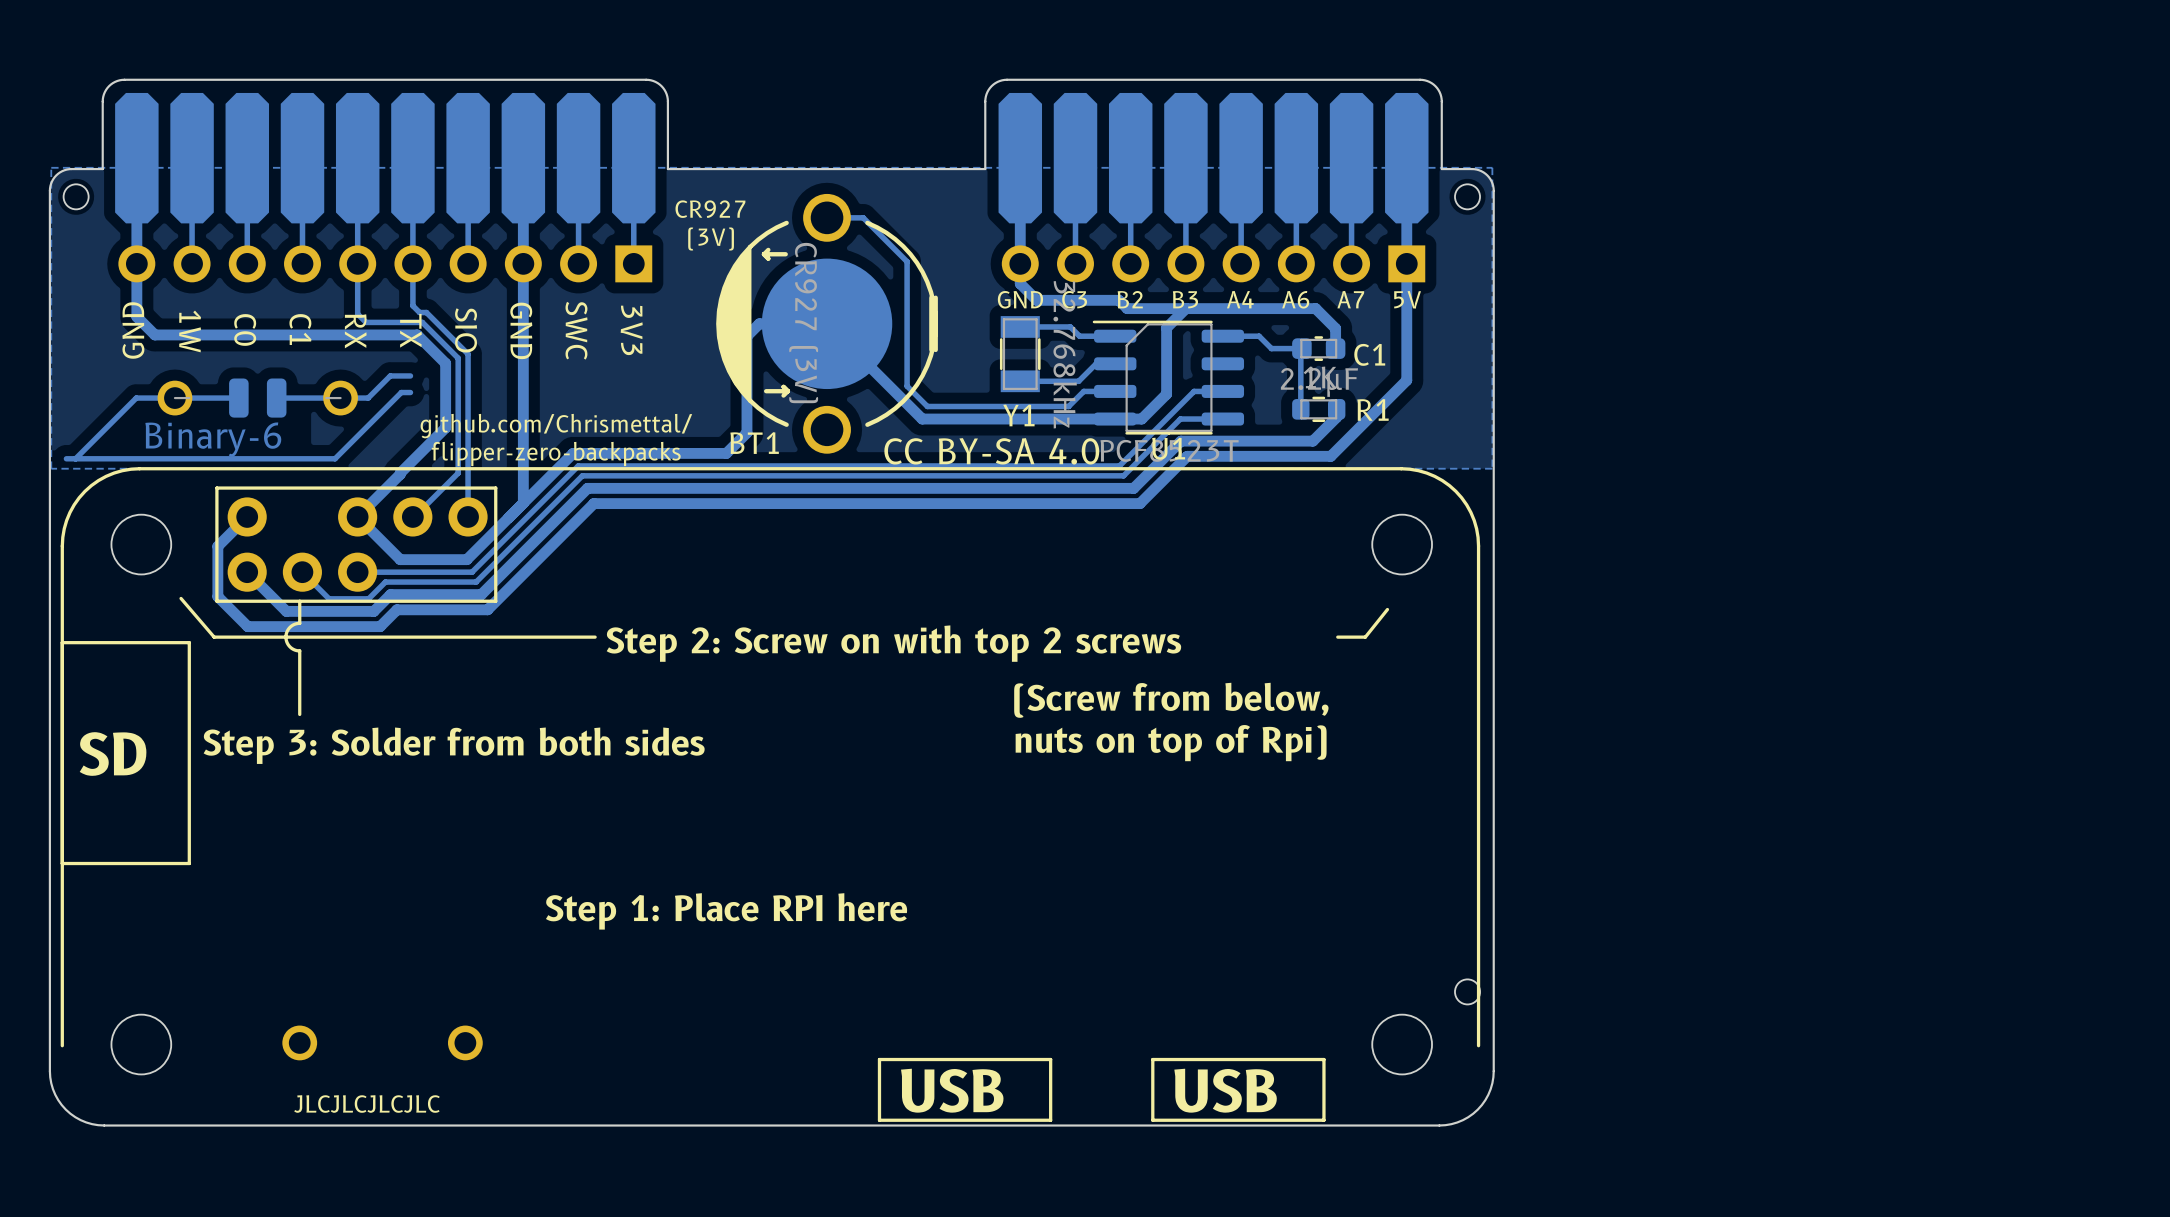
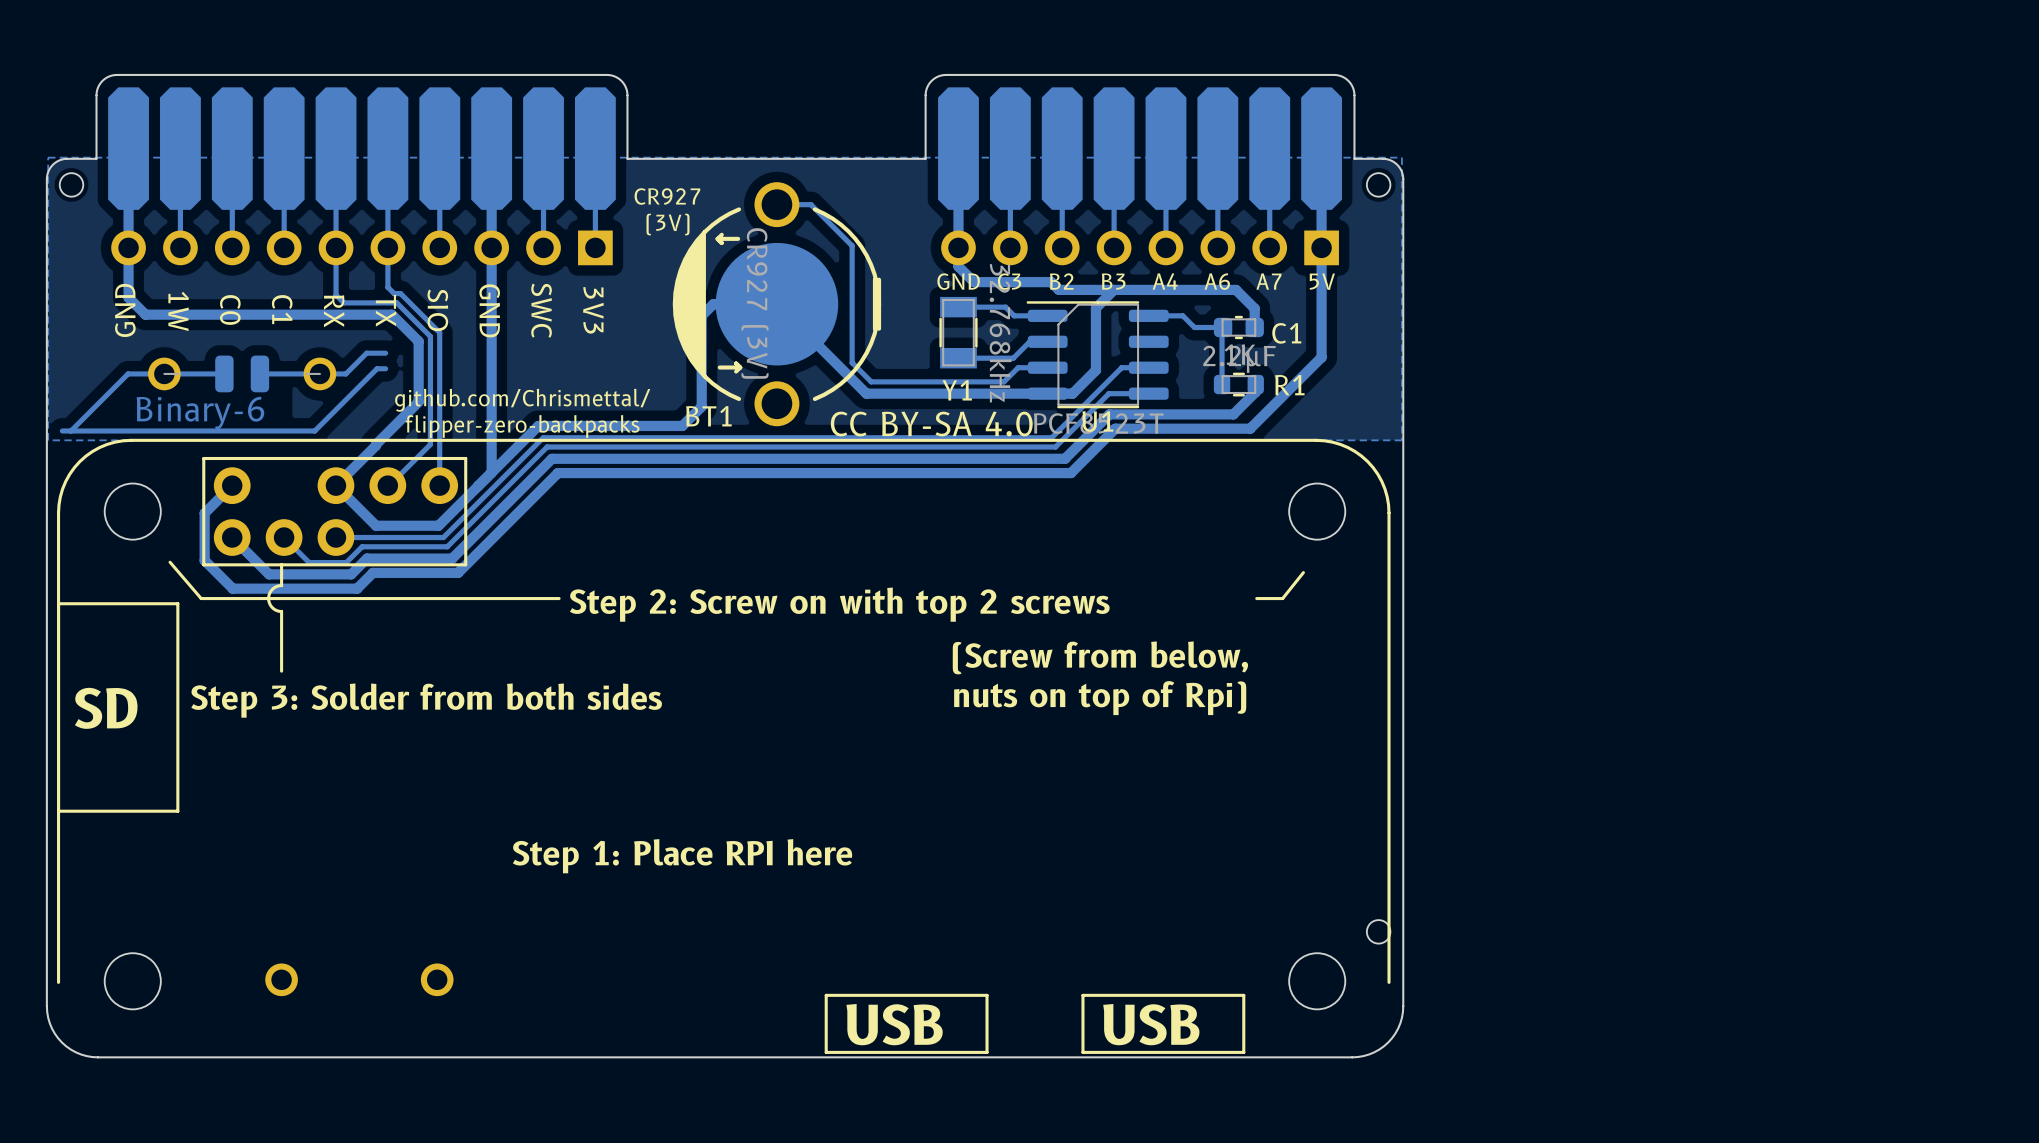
text: JLCJLCJLCJLC (366, 1104) -> none

